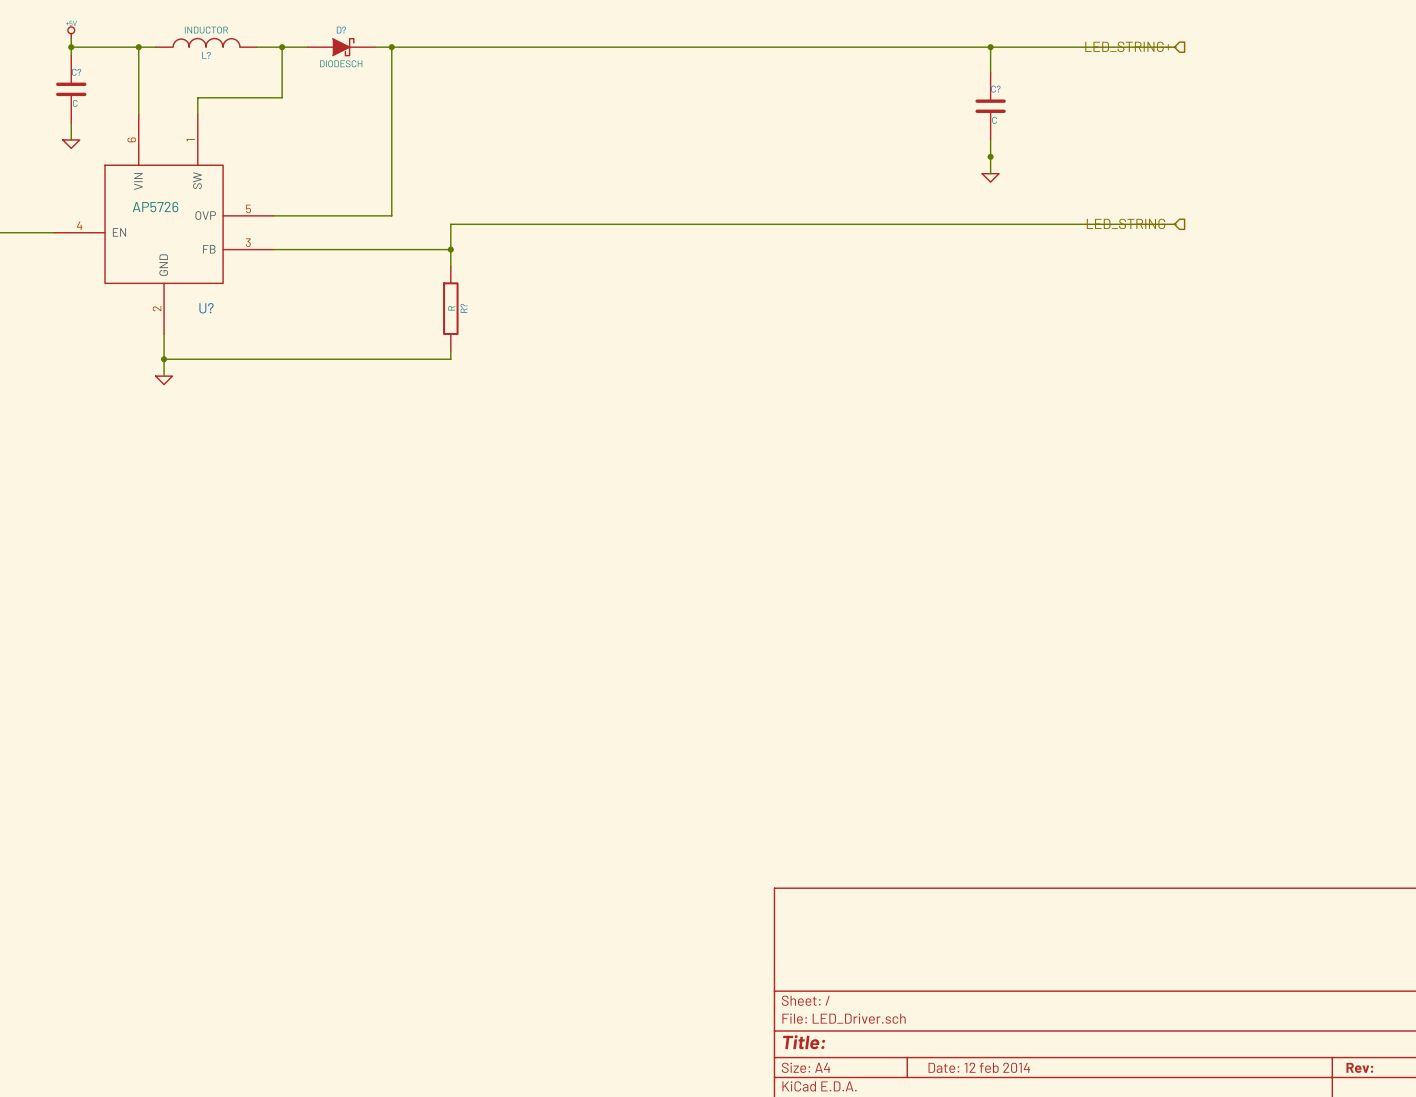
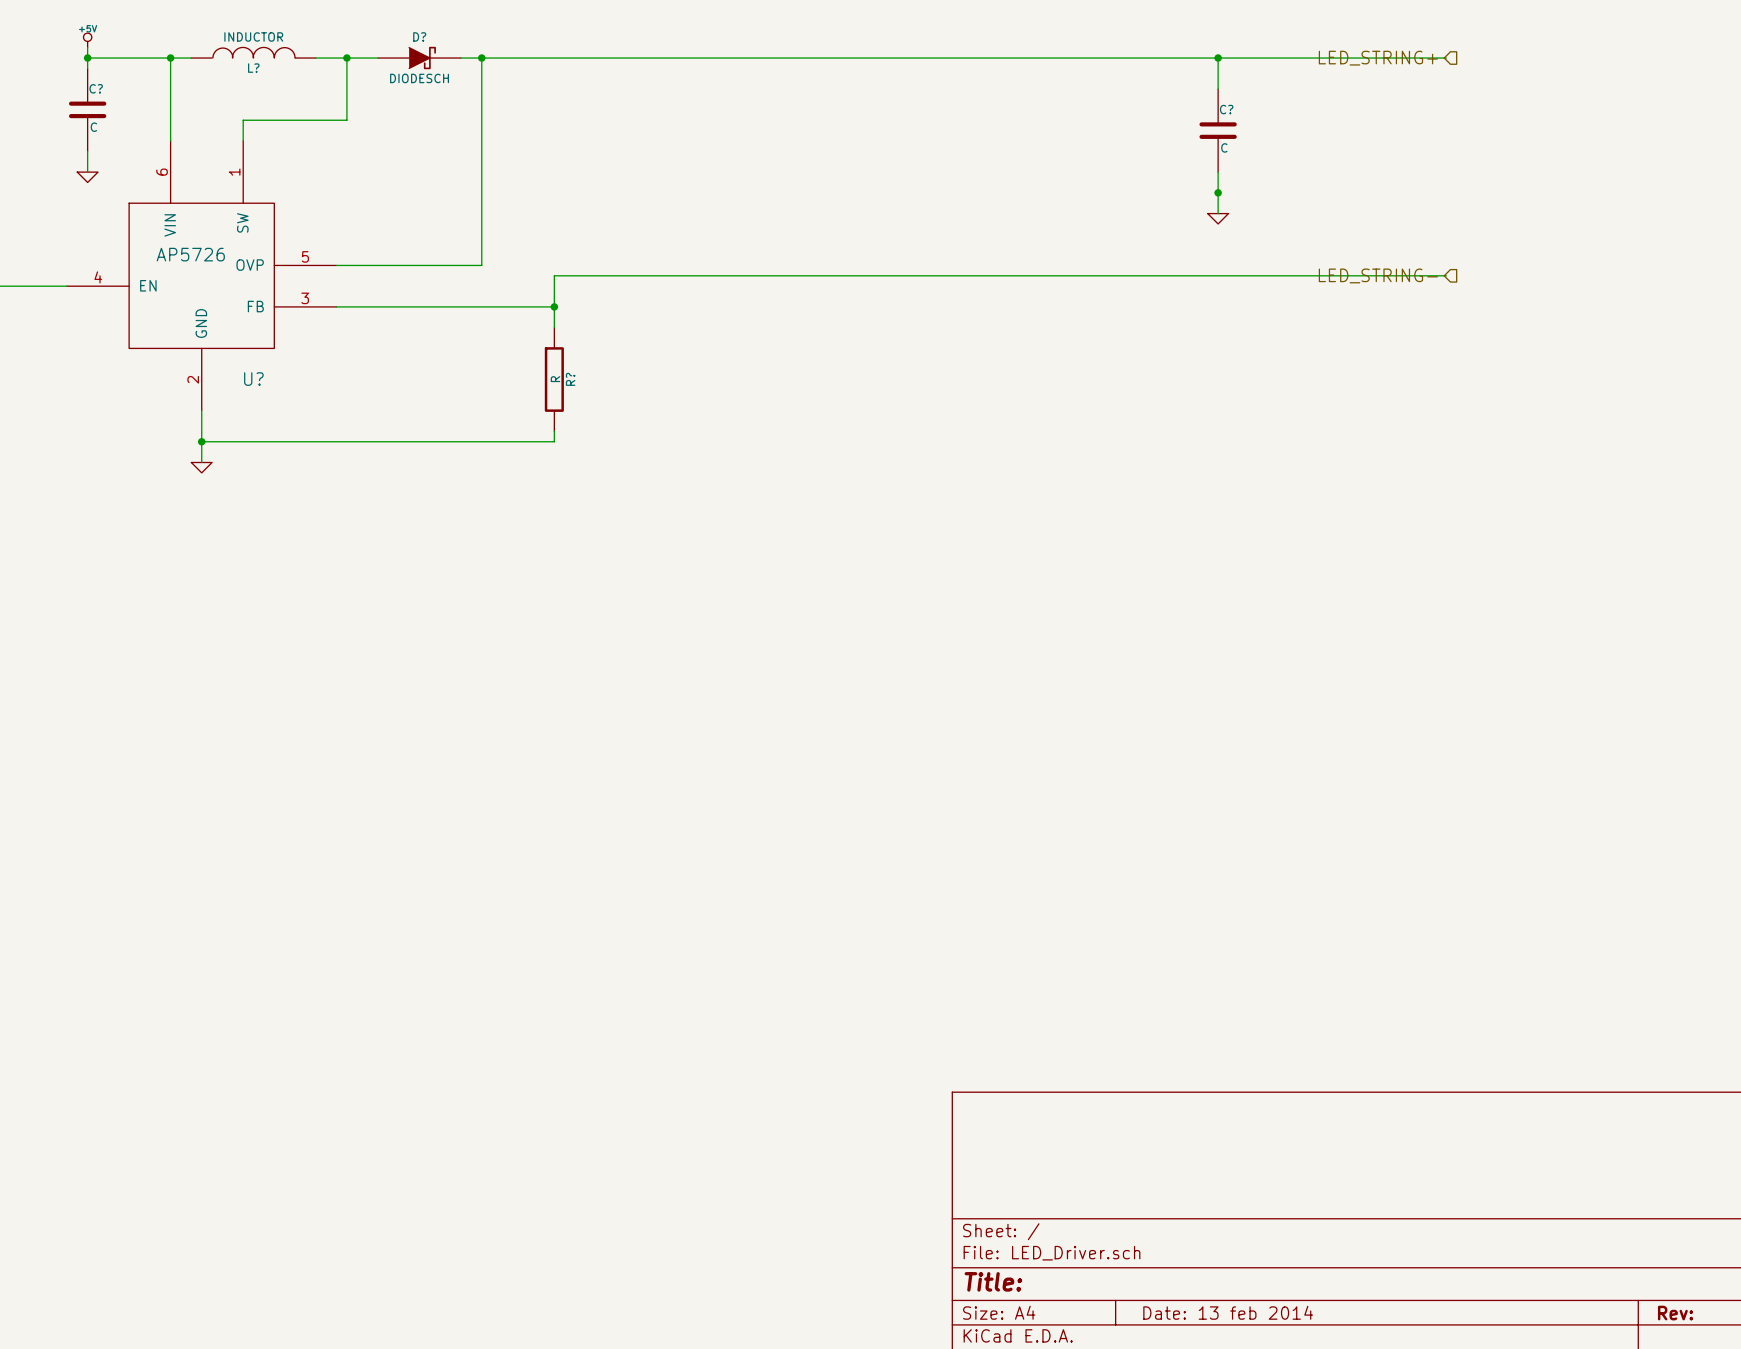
title block: Date: 12 feb 2014 (979, 1067) -> Date: 13 feb 2014 (1228, 1312)

